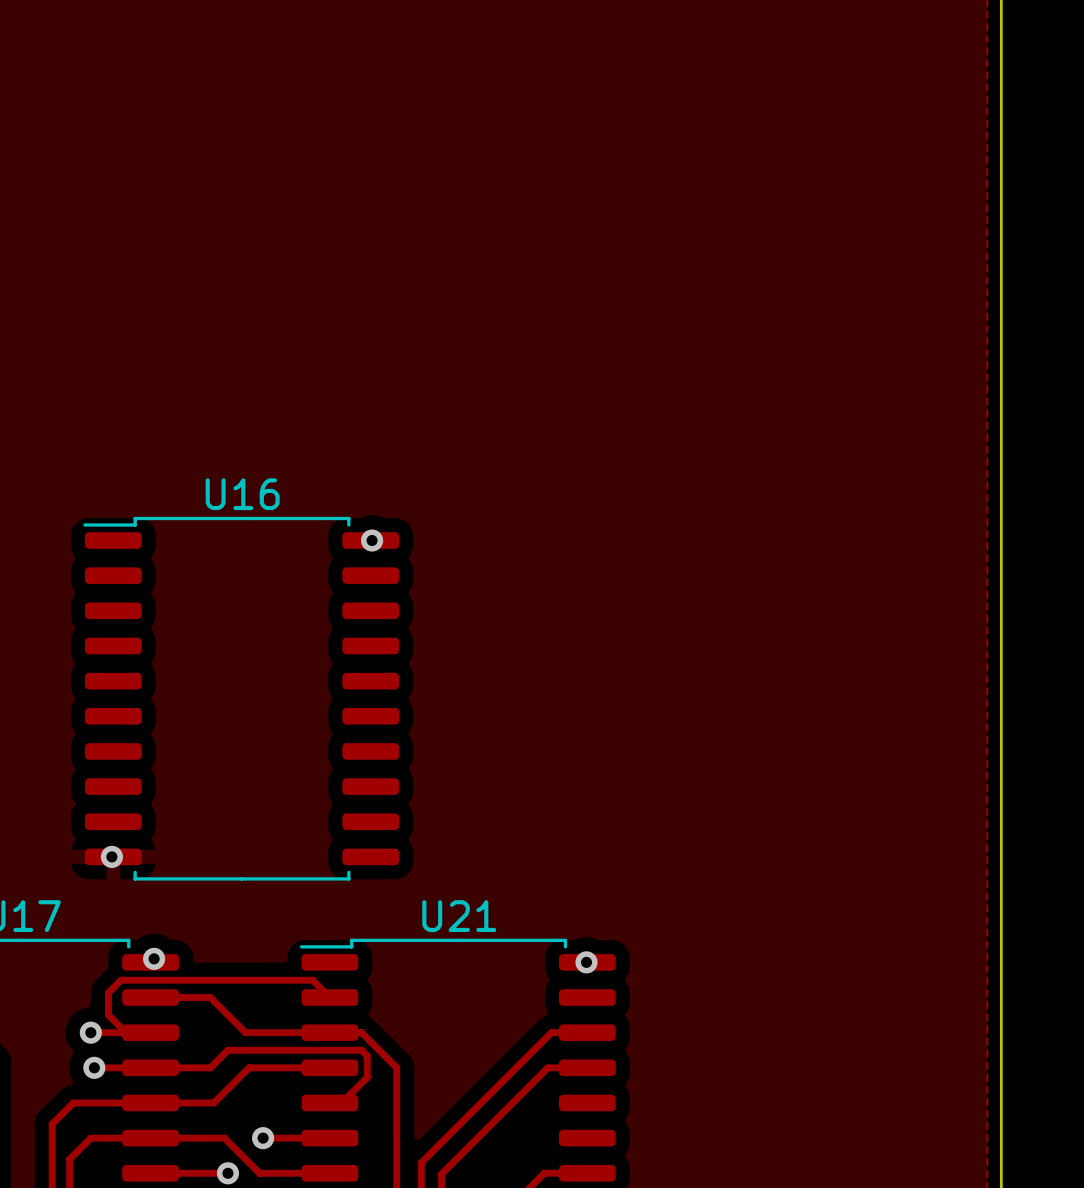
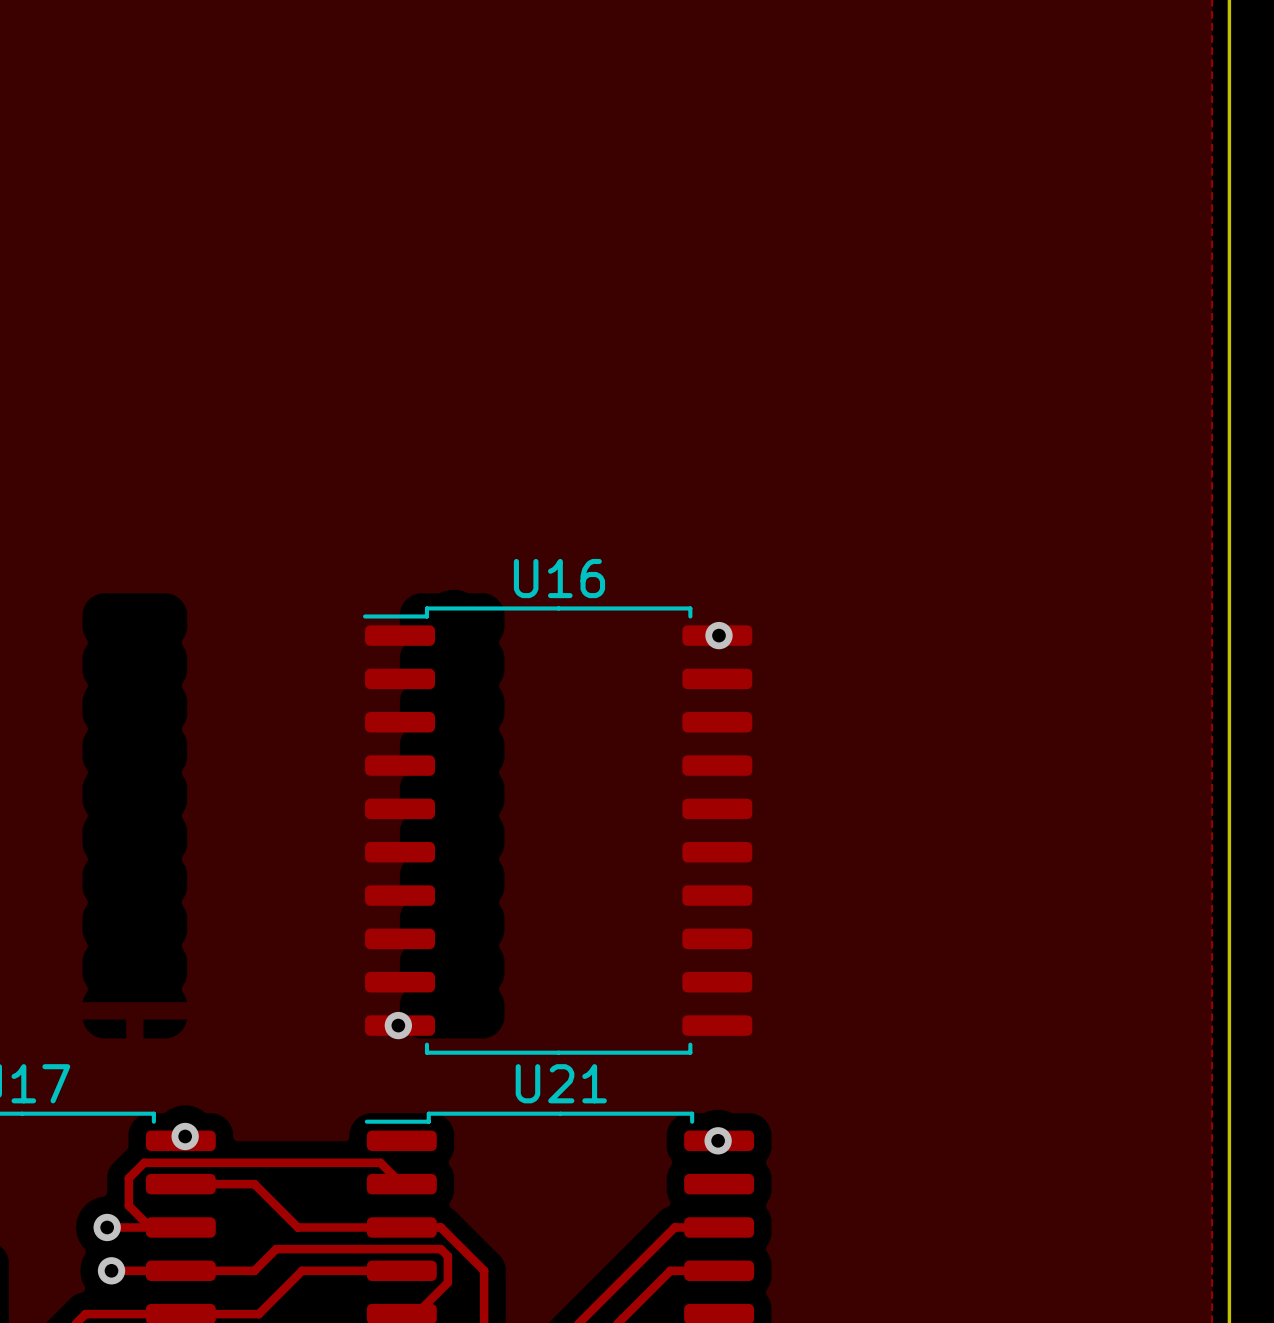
via: (372, 540) -> none
via: none -> (718, 635)
U16 position: (241, 698) -> (557, 830)
via: (111, 856) -> none
via: none -> (398, 1025)

